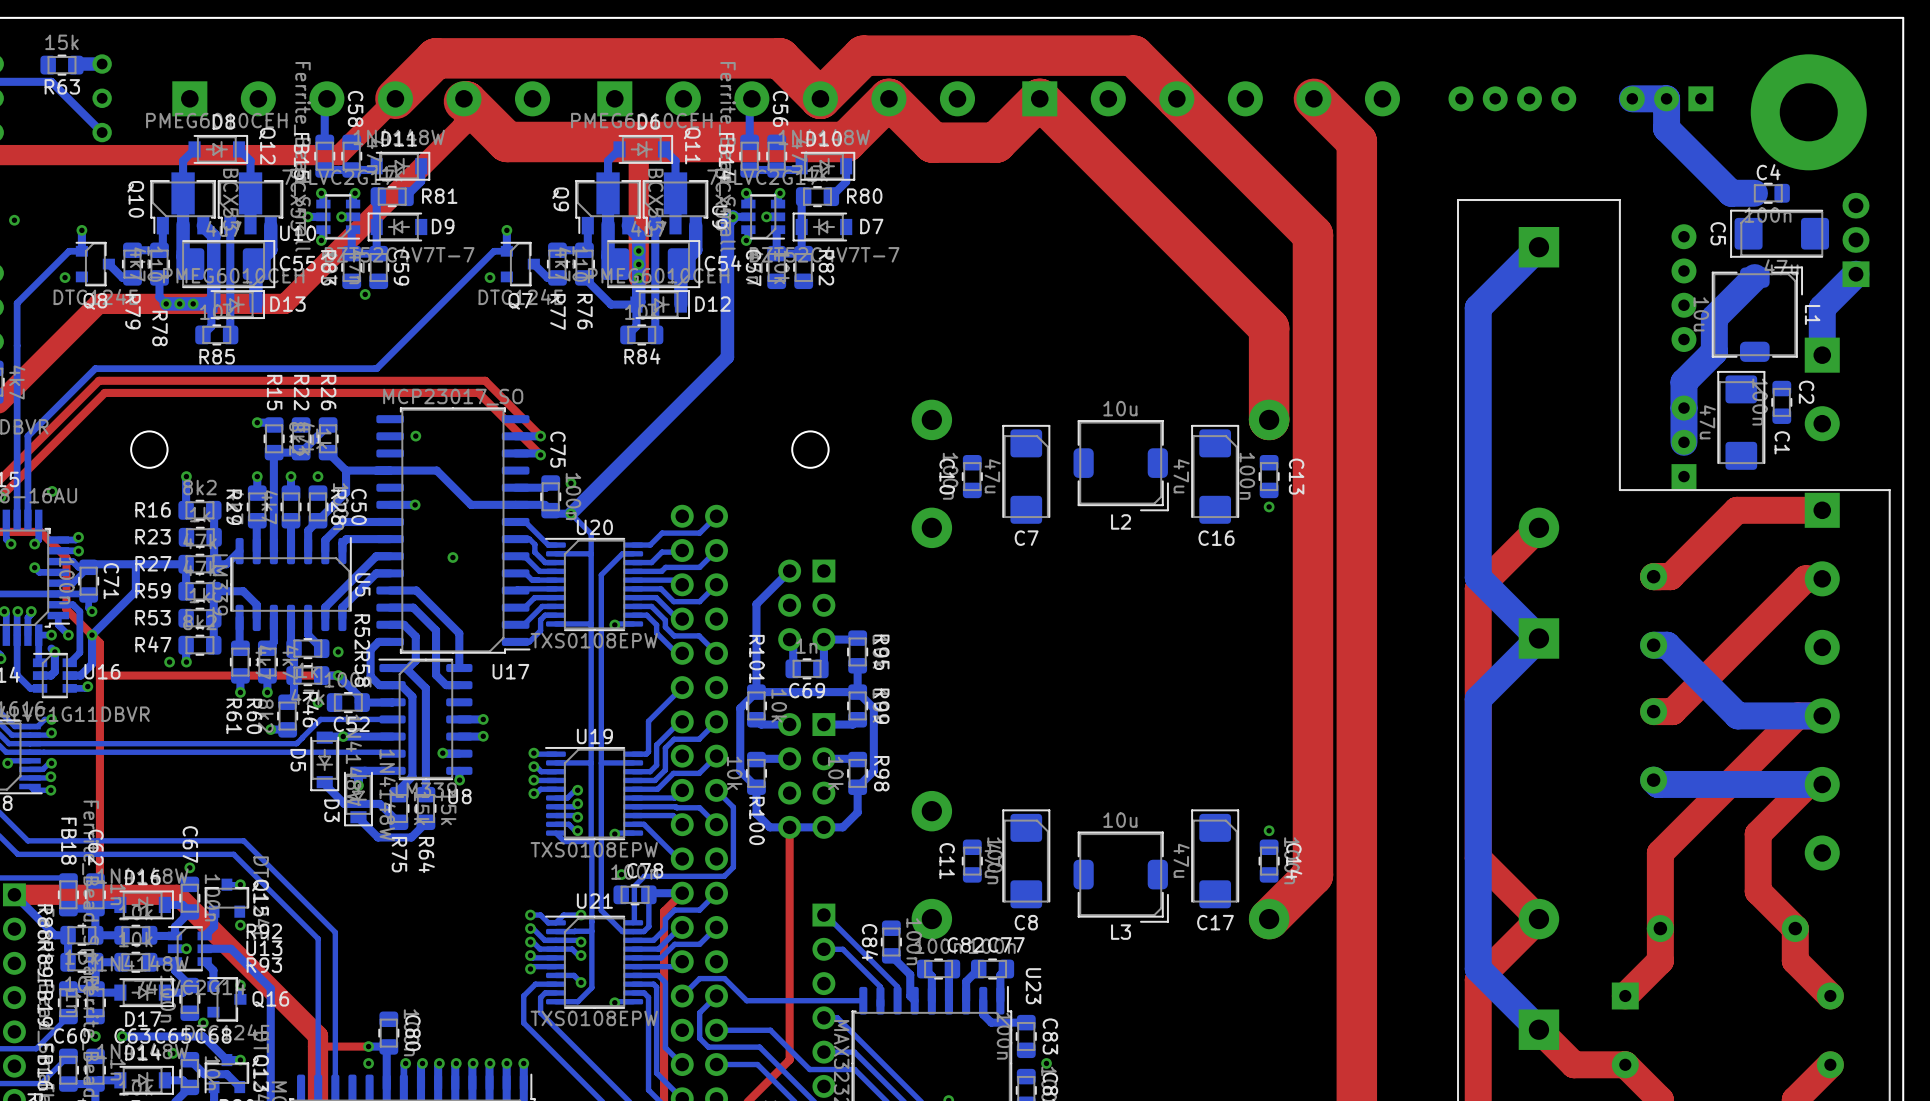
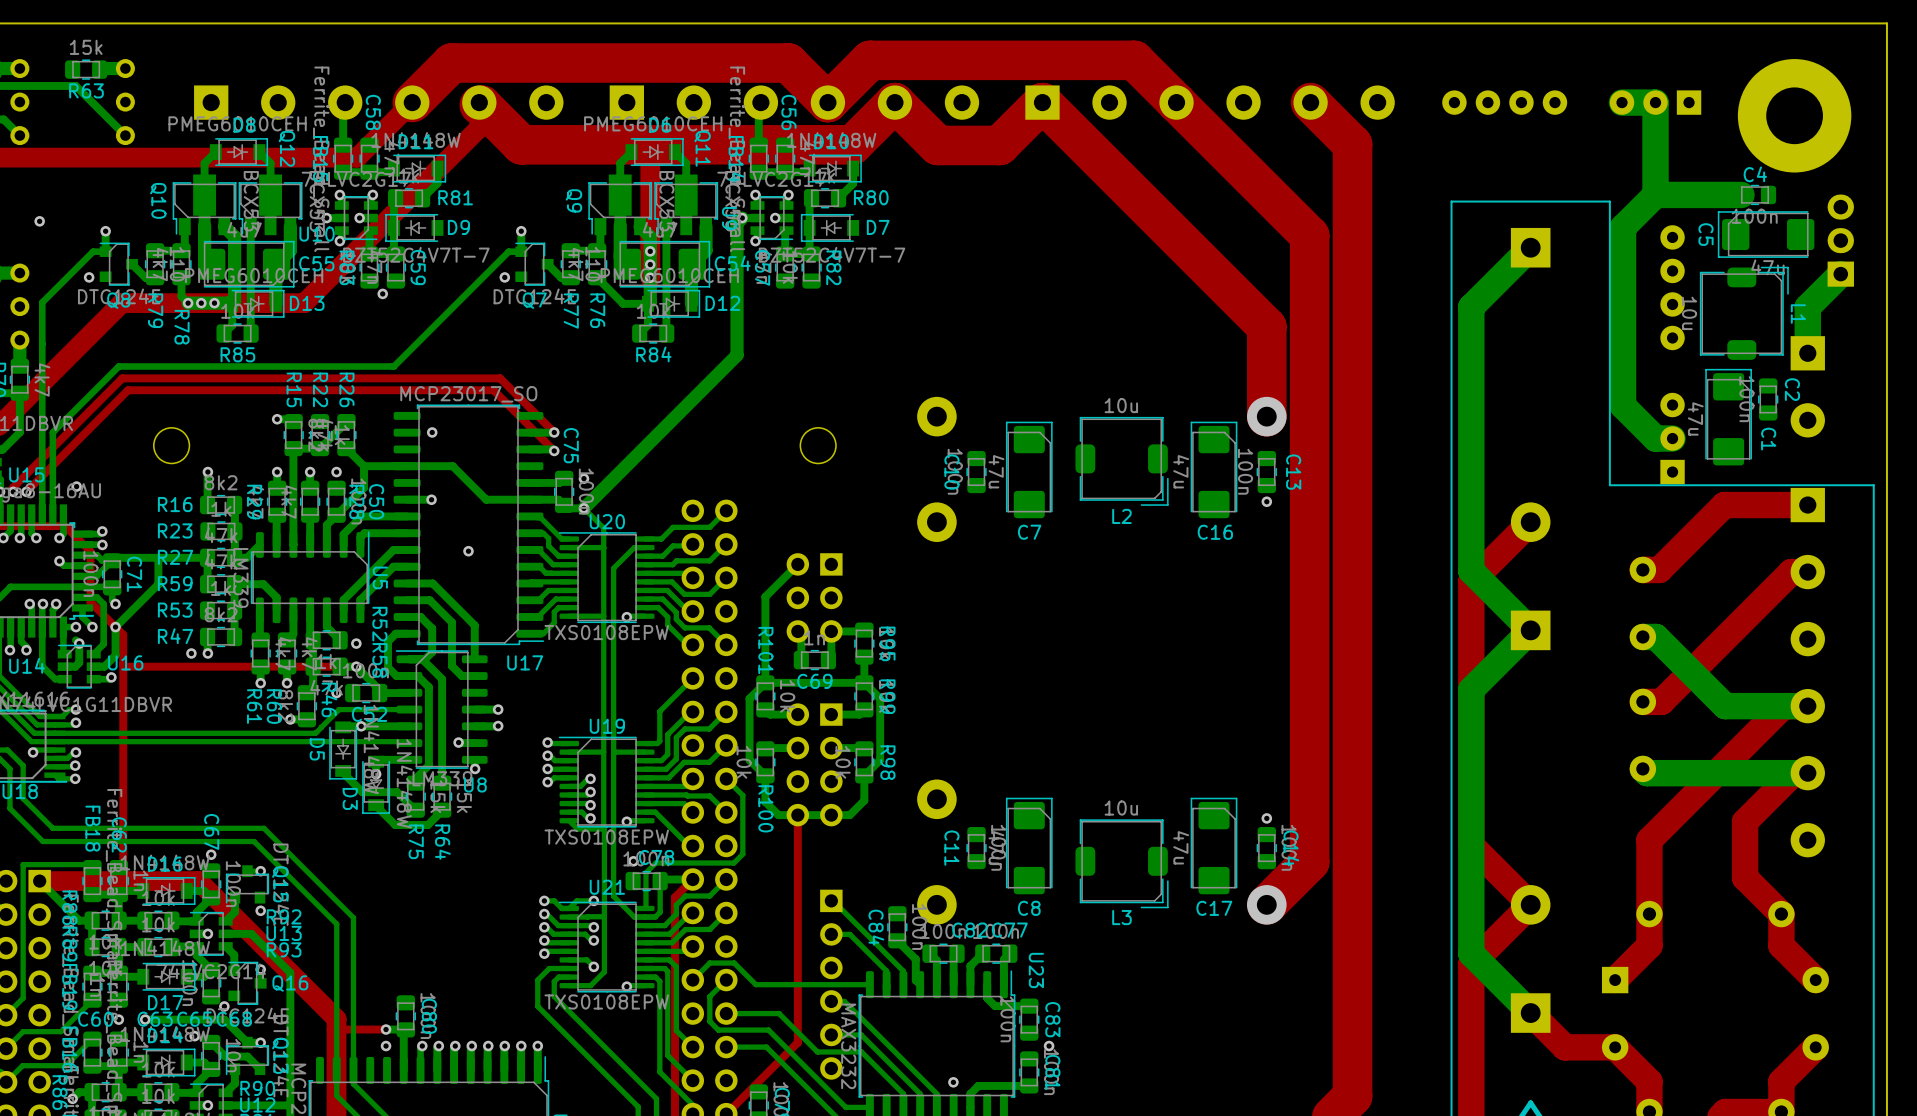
bottom track: (1666, 128) (1731, 193) -> (1655, 131) (1655, 194)
bottom track: none -> (1718, 194) (1655, 194)
bottom track: (1754, 277) (1714, 318) (1714, 351) (1683, 382) (1683, 442) -> (1655, 194) (1623, 227) (1623, 406) (1655, 438) (1672, 438)

